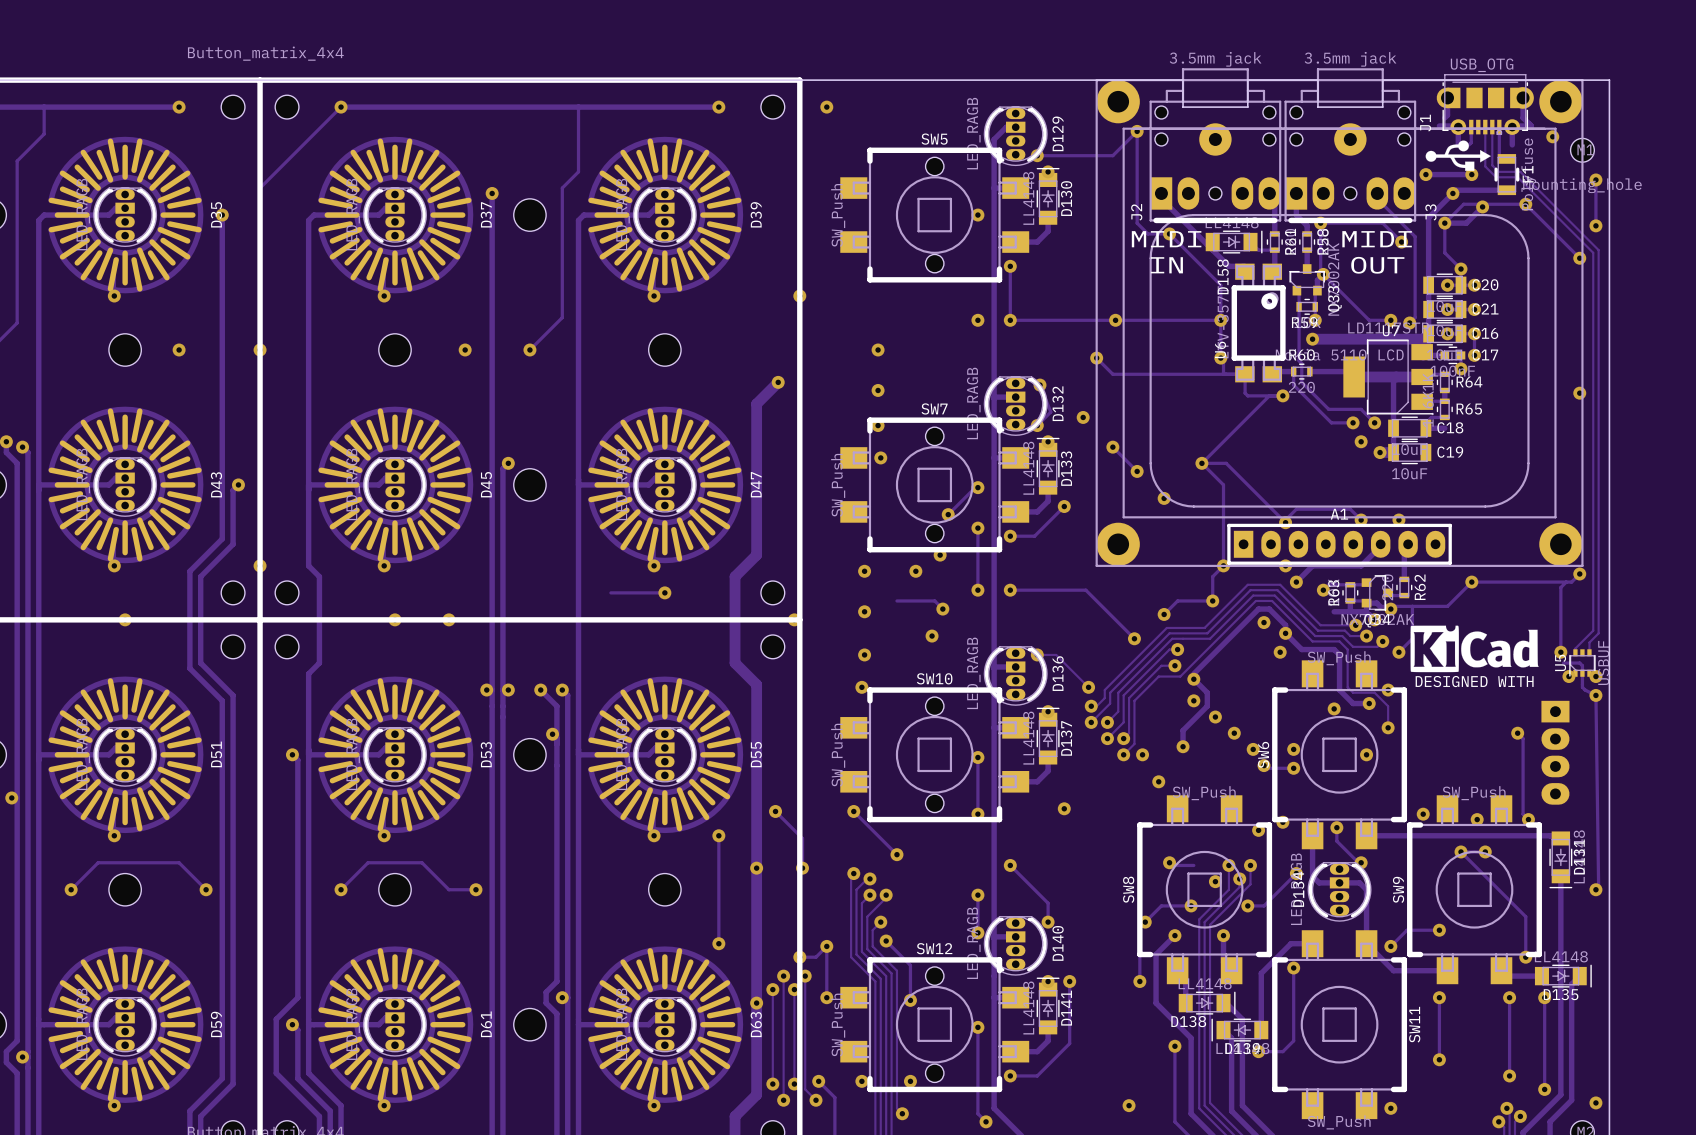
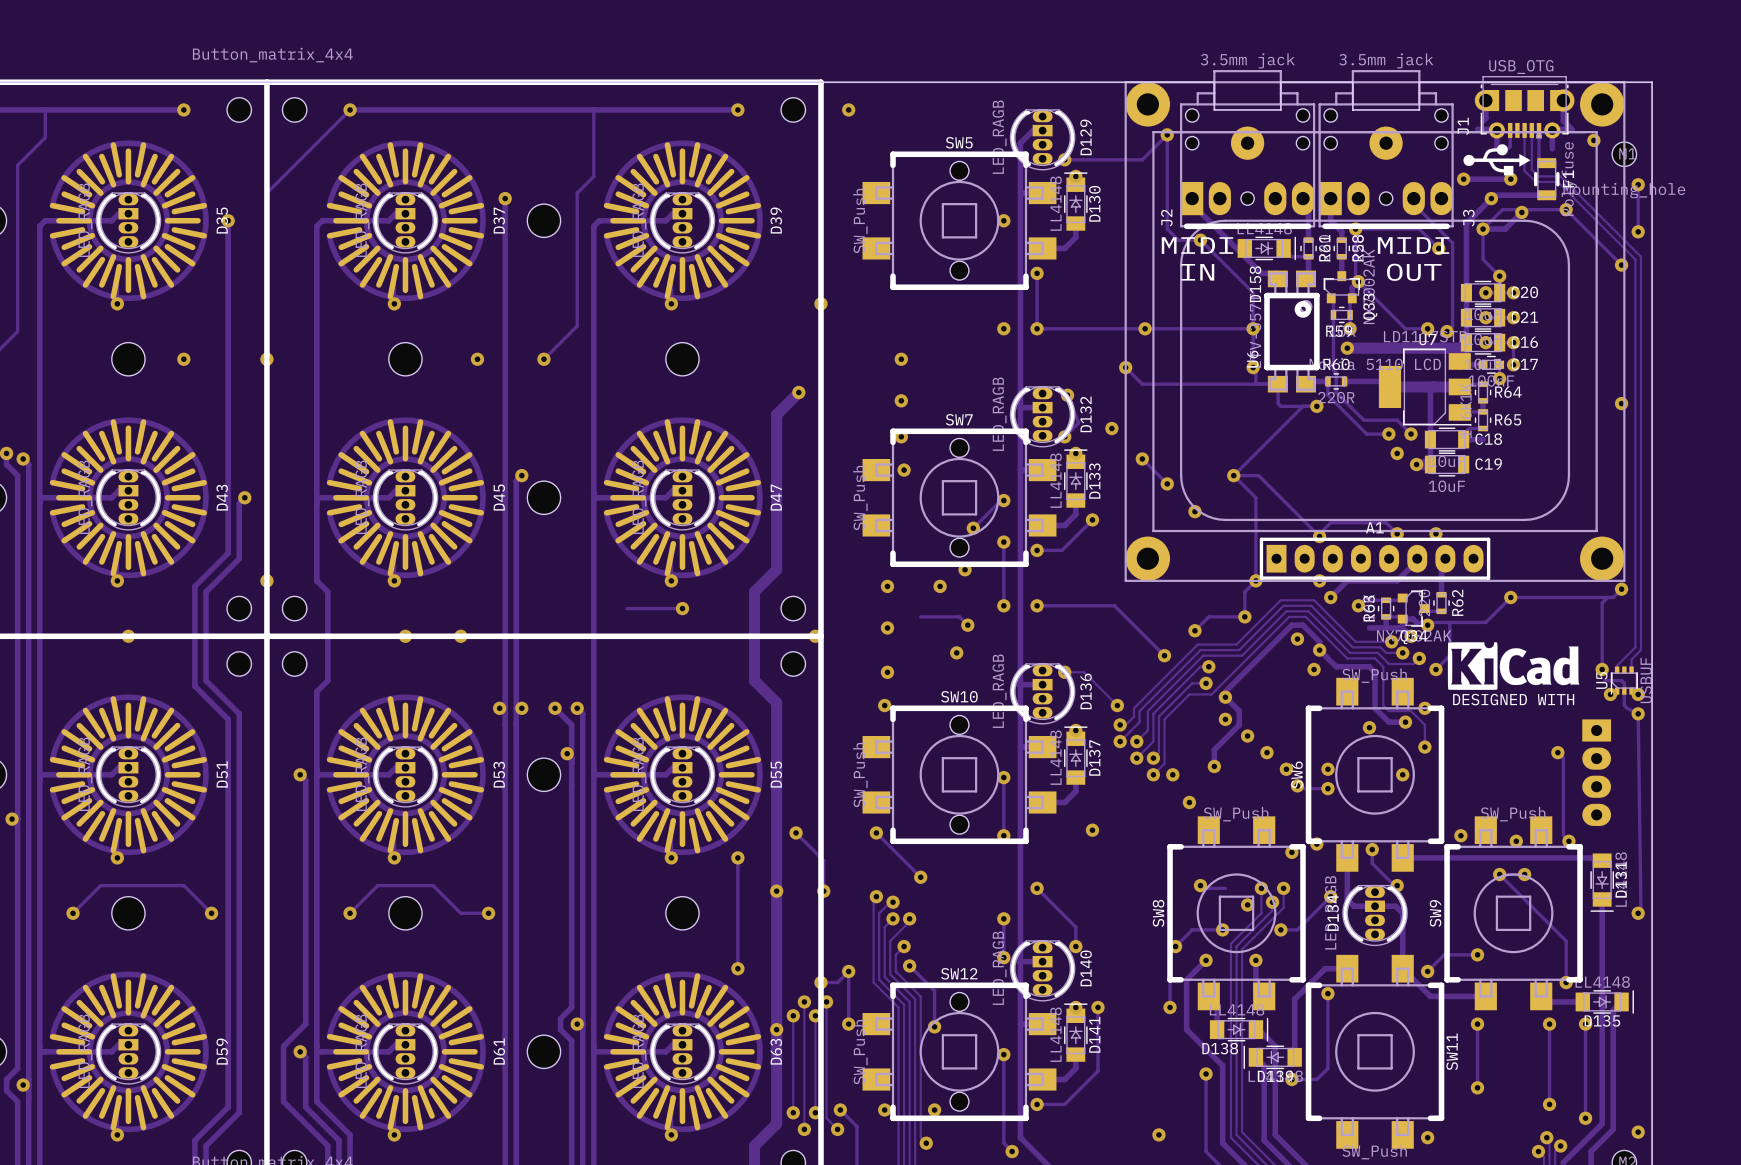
R60 value: 220 (1301, 387) -> 220R (1336, 397)

